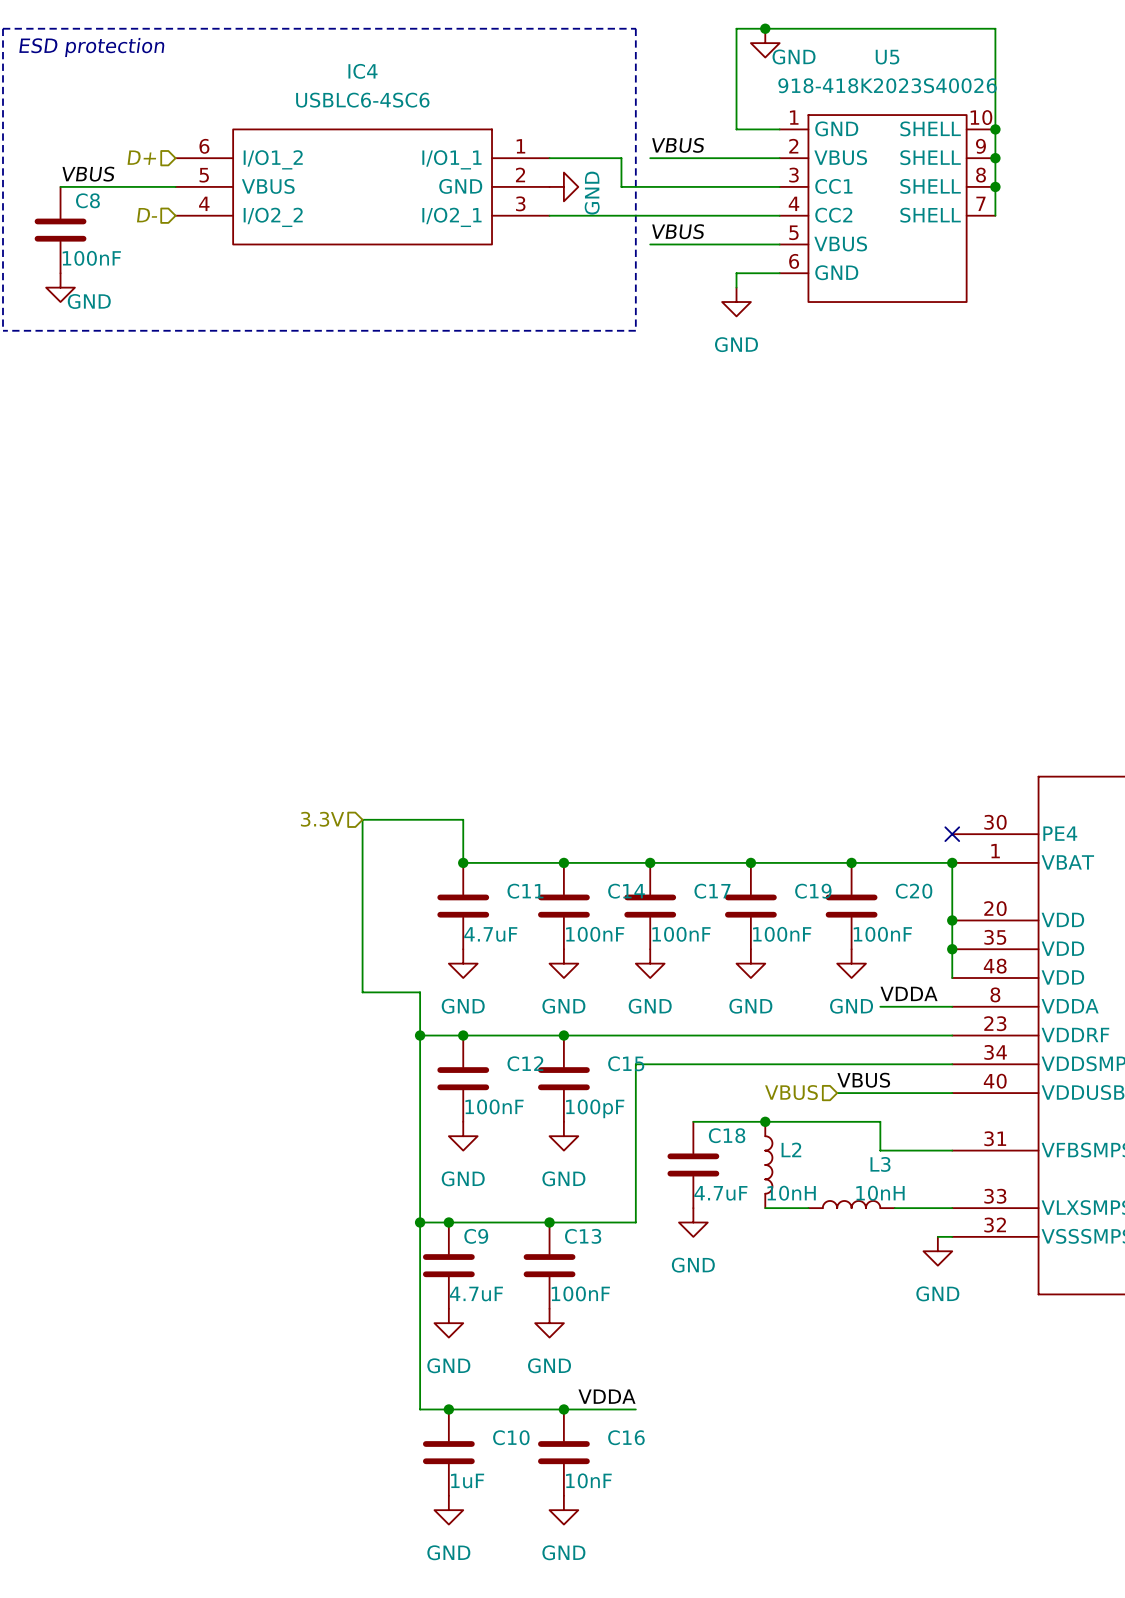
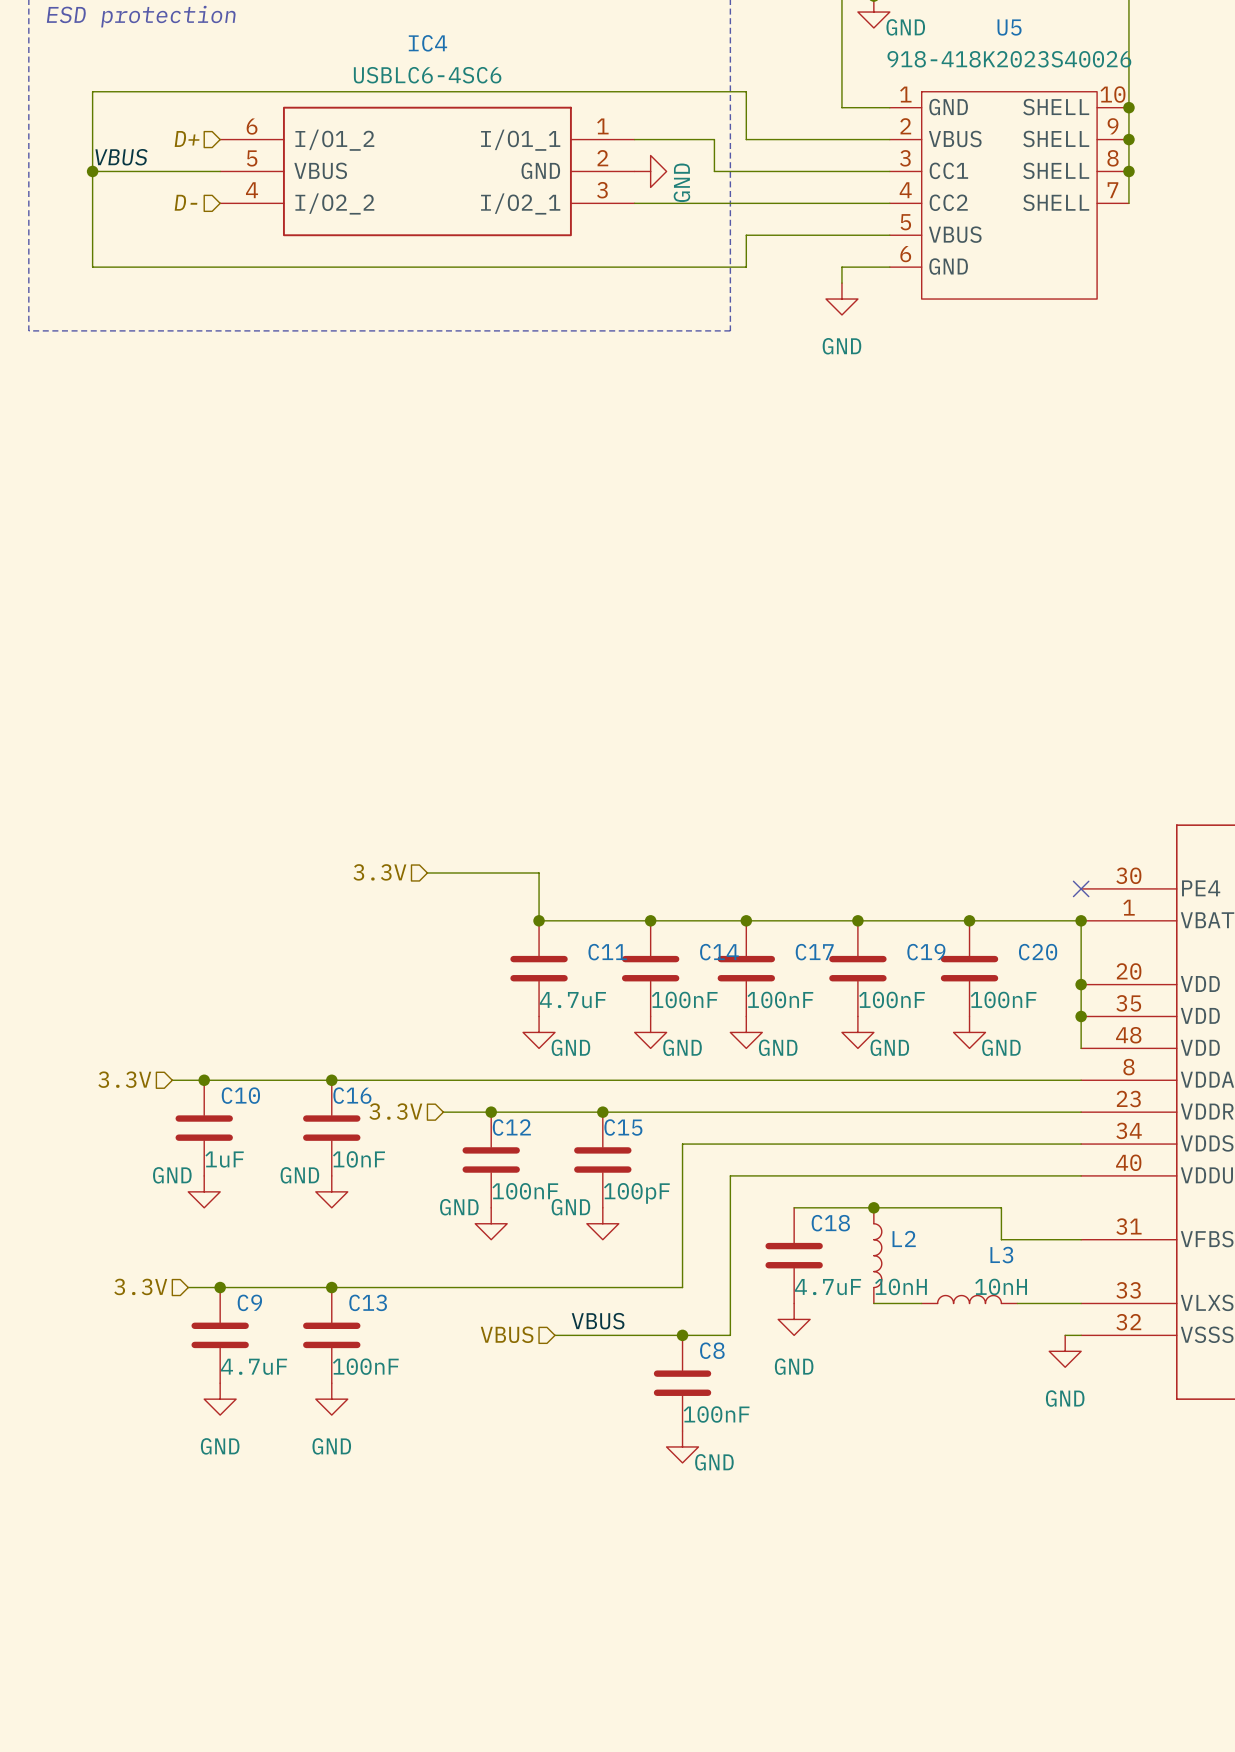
label: VBUS (678, 145) -> none
wire: none -> (746, 139) (746, 91) (92, 91) (92, 267) (746, 267) (746, 235)
junction: none -> (92, 171)
C8 position: (60, 230) -> (682, 1383)
label: VBUS (678, 231) -> none
power symbol: GND (60, 287) -> none
wire: (362, 819) (362, 992) (420, 992) (420, 1409) (635, 1409) -> none
label: VDDA (909, 993) -> none
hierarchical label: none -> 3.3V (124, 1079)
wire: none -> (172, 1080) (1001, 1080)
junction: none -> (204, 1080)
junction: none -> (331, 1080)
power symbol text position: GND (463, 1006) -> GND (570, 1047)
power symbol text position: GND (563, 1006) -> GND (682, 1047)
power symbol text position: GND (650, 1006) -> GND (778, 1047)
power symbol text position: GND (750, 1006) -> GND (889, 1047)
power symbol text position: GND (851, 1006) -> GND (1001, 1047)
hierarchical label: none -> 3.3V (395, 1111)
wire: none -> (443, 1112) (491, 1112)
junction: (463, 1035) -> none
junction: none -> (602, 1112)
junction: (563, 1035) -> none
C12 name position: C12 (525, 1063) -> C12 (511, 1127)
C15 name position: C15 (626, 1063) -> C15 (623, 1127)
wire: (635, 1064) (635, 1093) -> (953, 1175) (730, 1175)
wire: none -> (730, 1144) (682, 1144) (682, 1287) (188, 1287)
C12 position: (463, 1078) -> (491, 1159)
C15 position: (563, 1078) -> (602, 1159)
label: VBUS (863, 1080) -> none
hierarchical label: VBUS (791, 1092) -> none
power symbol: none -> GND (204, 1191)
power symbol: none -> GND (331, 1191)
power symbol: none -> GND (491, 1223)
power symbol: GND (463, 1136) -> none
power symbol: none -> GND (602, 1223)
power symbol: GND (563, 1136) -> none
hierarchical label: none -> 3.3V (140, 1286)
junction: none -> (220, 1287)
junction: none -> (331, 1287)
wire: (420, 1222) (635, 1222) -> (554, 1335) (730, 1335) (730, 1319)
junction: (420, 1222) -> none
junction: (448, 1222) -> none
junction position: (549, 1222) -> (682, 1335)
label: none -> VBUS (598, 1321)
hierarchical label: none -> VBUS (507, 1334)
C9 position: (448, 1265) -> (220, 1335)
C13 position: (549, 1265) -> (331, 1335)
power symbol: none -> GND (220, 1399)
power symbol: none -> GND (331, 1399)
power symbol: GND (448, 1323) -> none
power symbol position: GND (549, 1323) -> GND (682, 1446)
power symbol text position: GND (549, 1365) -> GND (714, 1462)
label: VDDA (606, 1396) -> none
junction: (448, 1409) -> none
junction: (563, 1409) -> none
C10 name position: C10 (511, 1437) -> C10 (240, 1095)
C16 name position: C16 (626, 1437) -> C16 (352, 1095)
C10 position: (448, 1452) -> (204, 1128)
C16 position: (563, 1452) -> (331, 1128)
power symbol: GND (448, 1510) -> none
power symbol: GND (563, 1510) -> none

